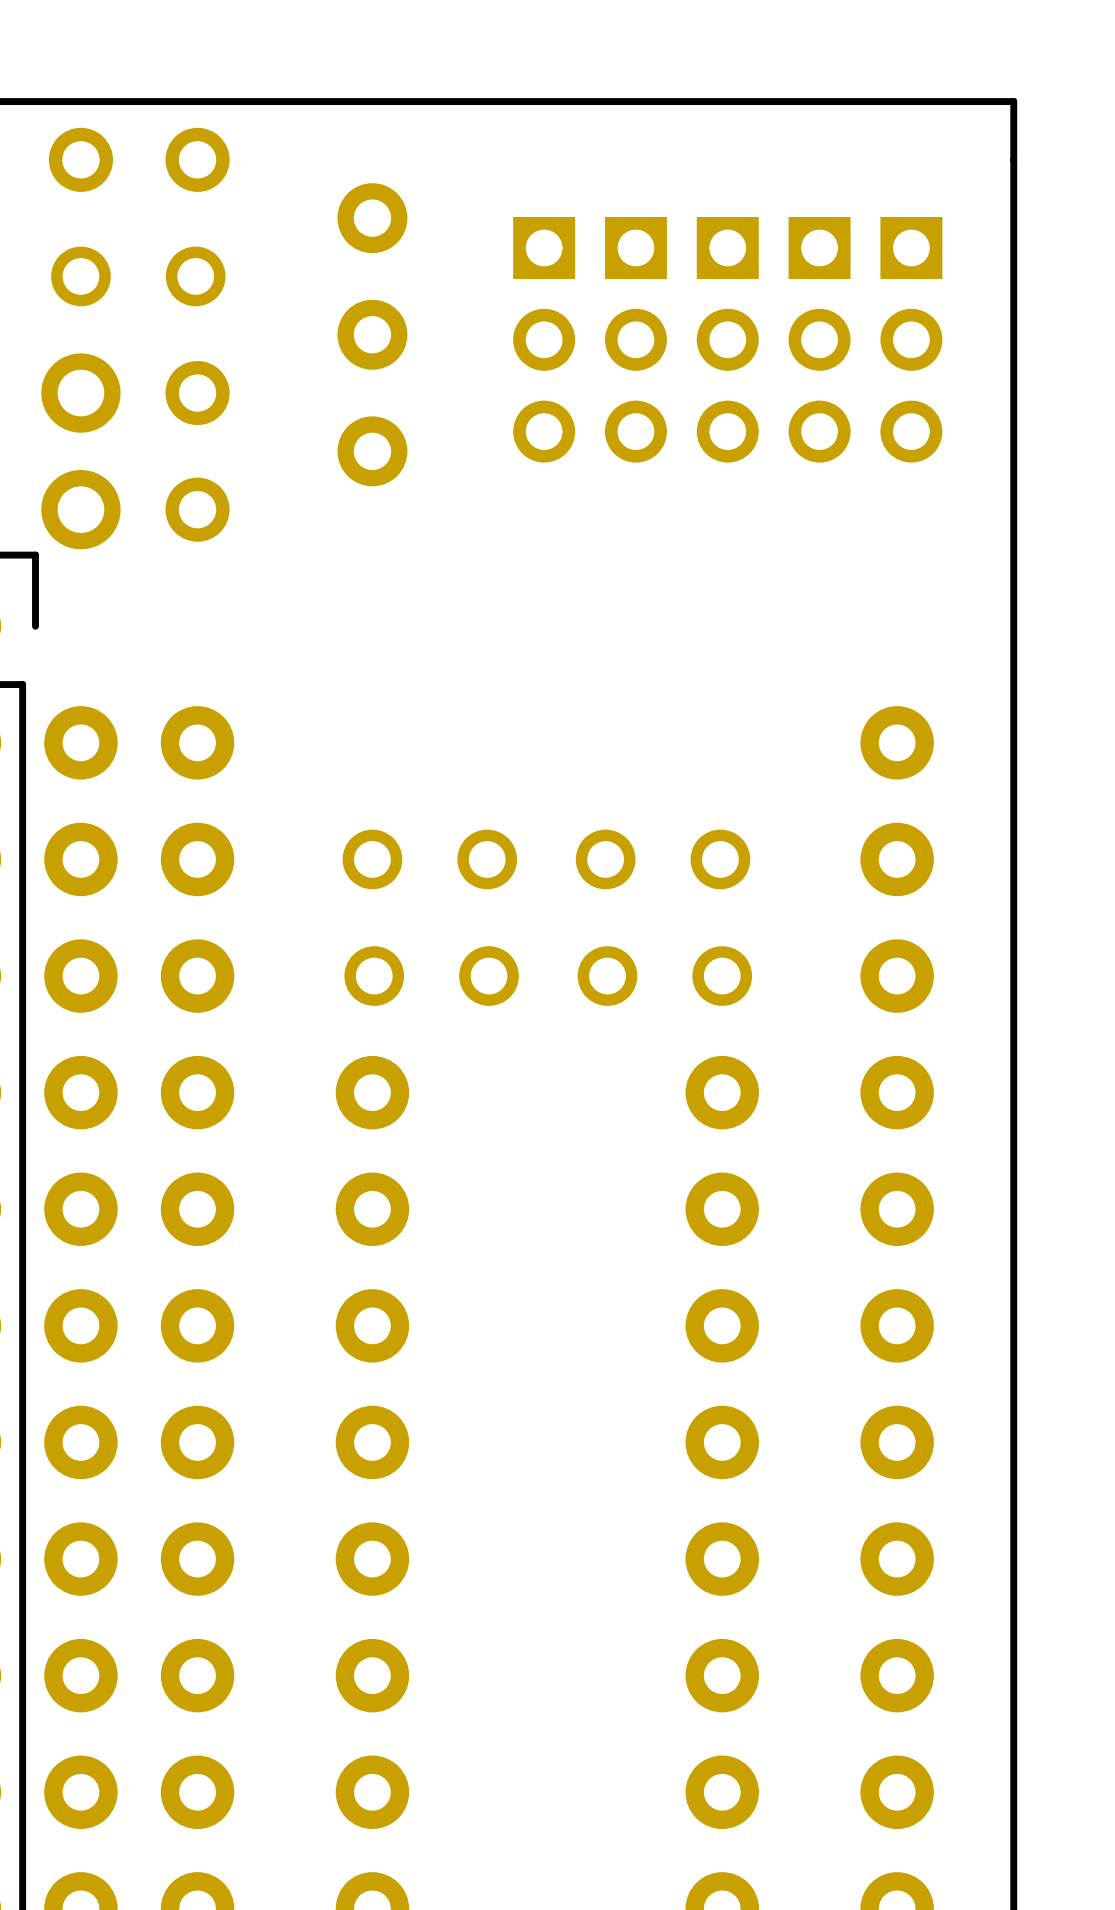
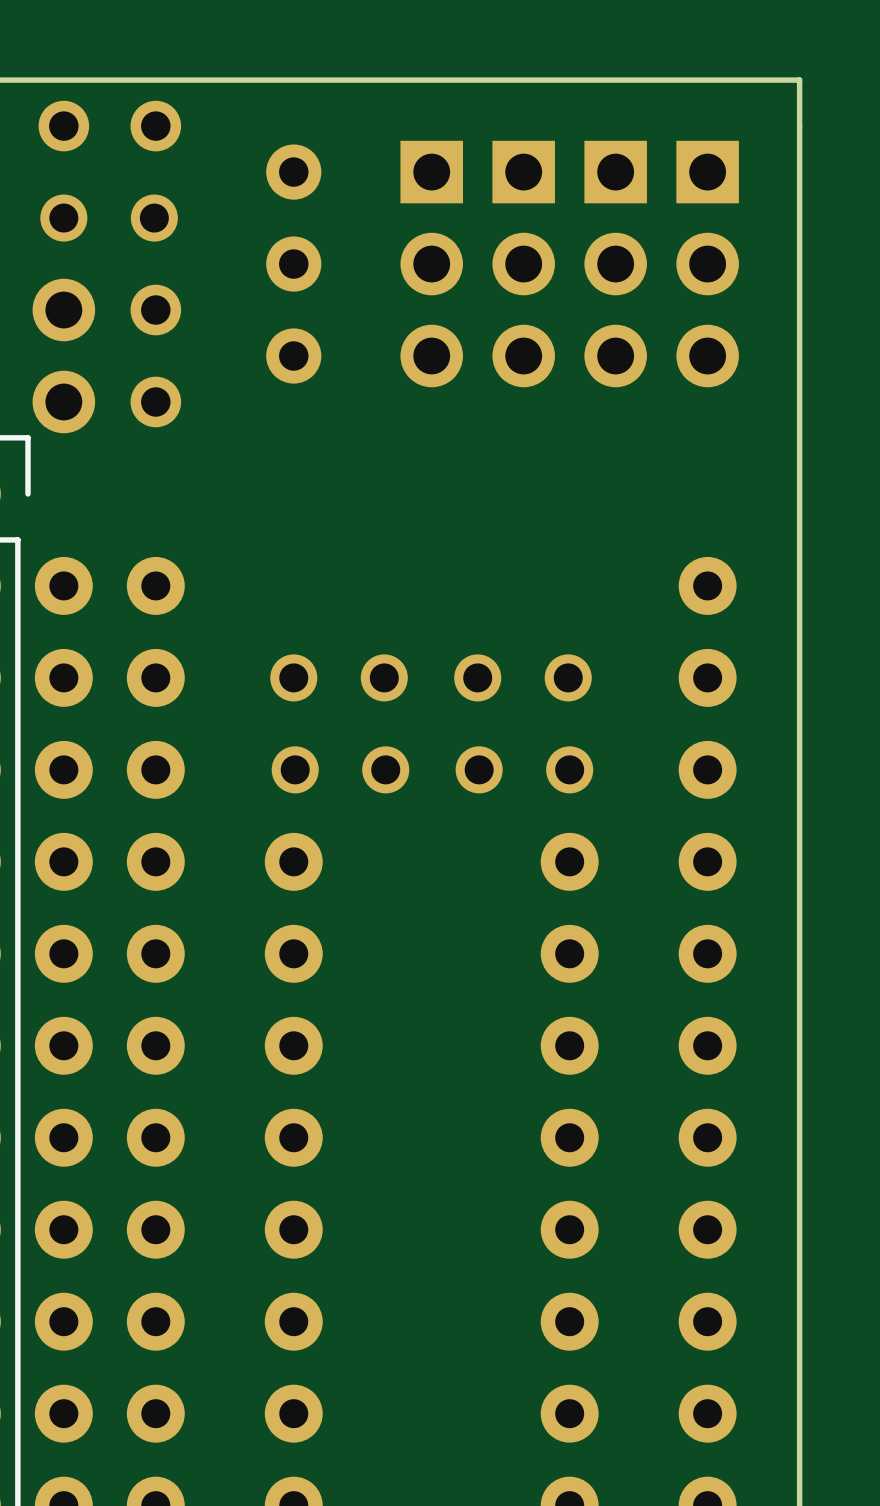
part footprint: [513, 217, 576, 463] -> [400, 140, 464, 388]
part footprint: [604, 217, 667, 463] -> [492, 140, 555, 388]
part footprint: [880, 217, 943, 463] -> [676, 140, 739, 388]
part: none -> (615, 264)
part: (727, 339) -> none
part: (819, 339) -> none

